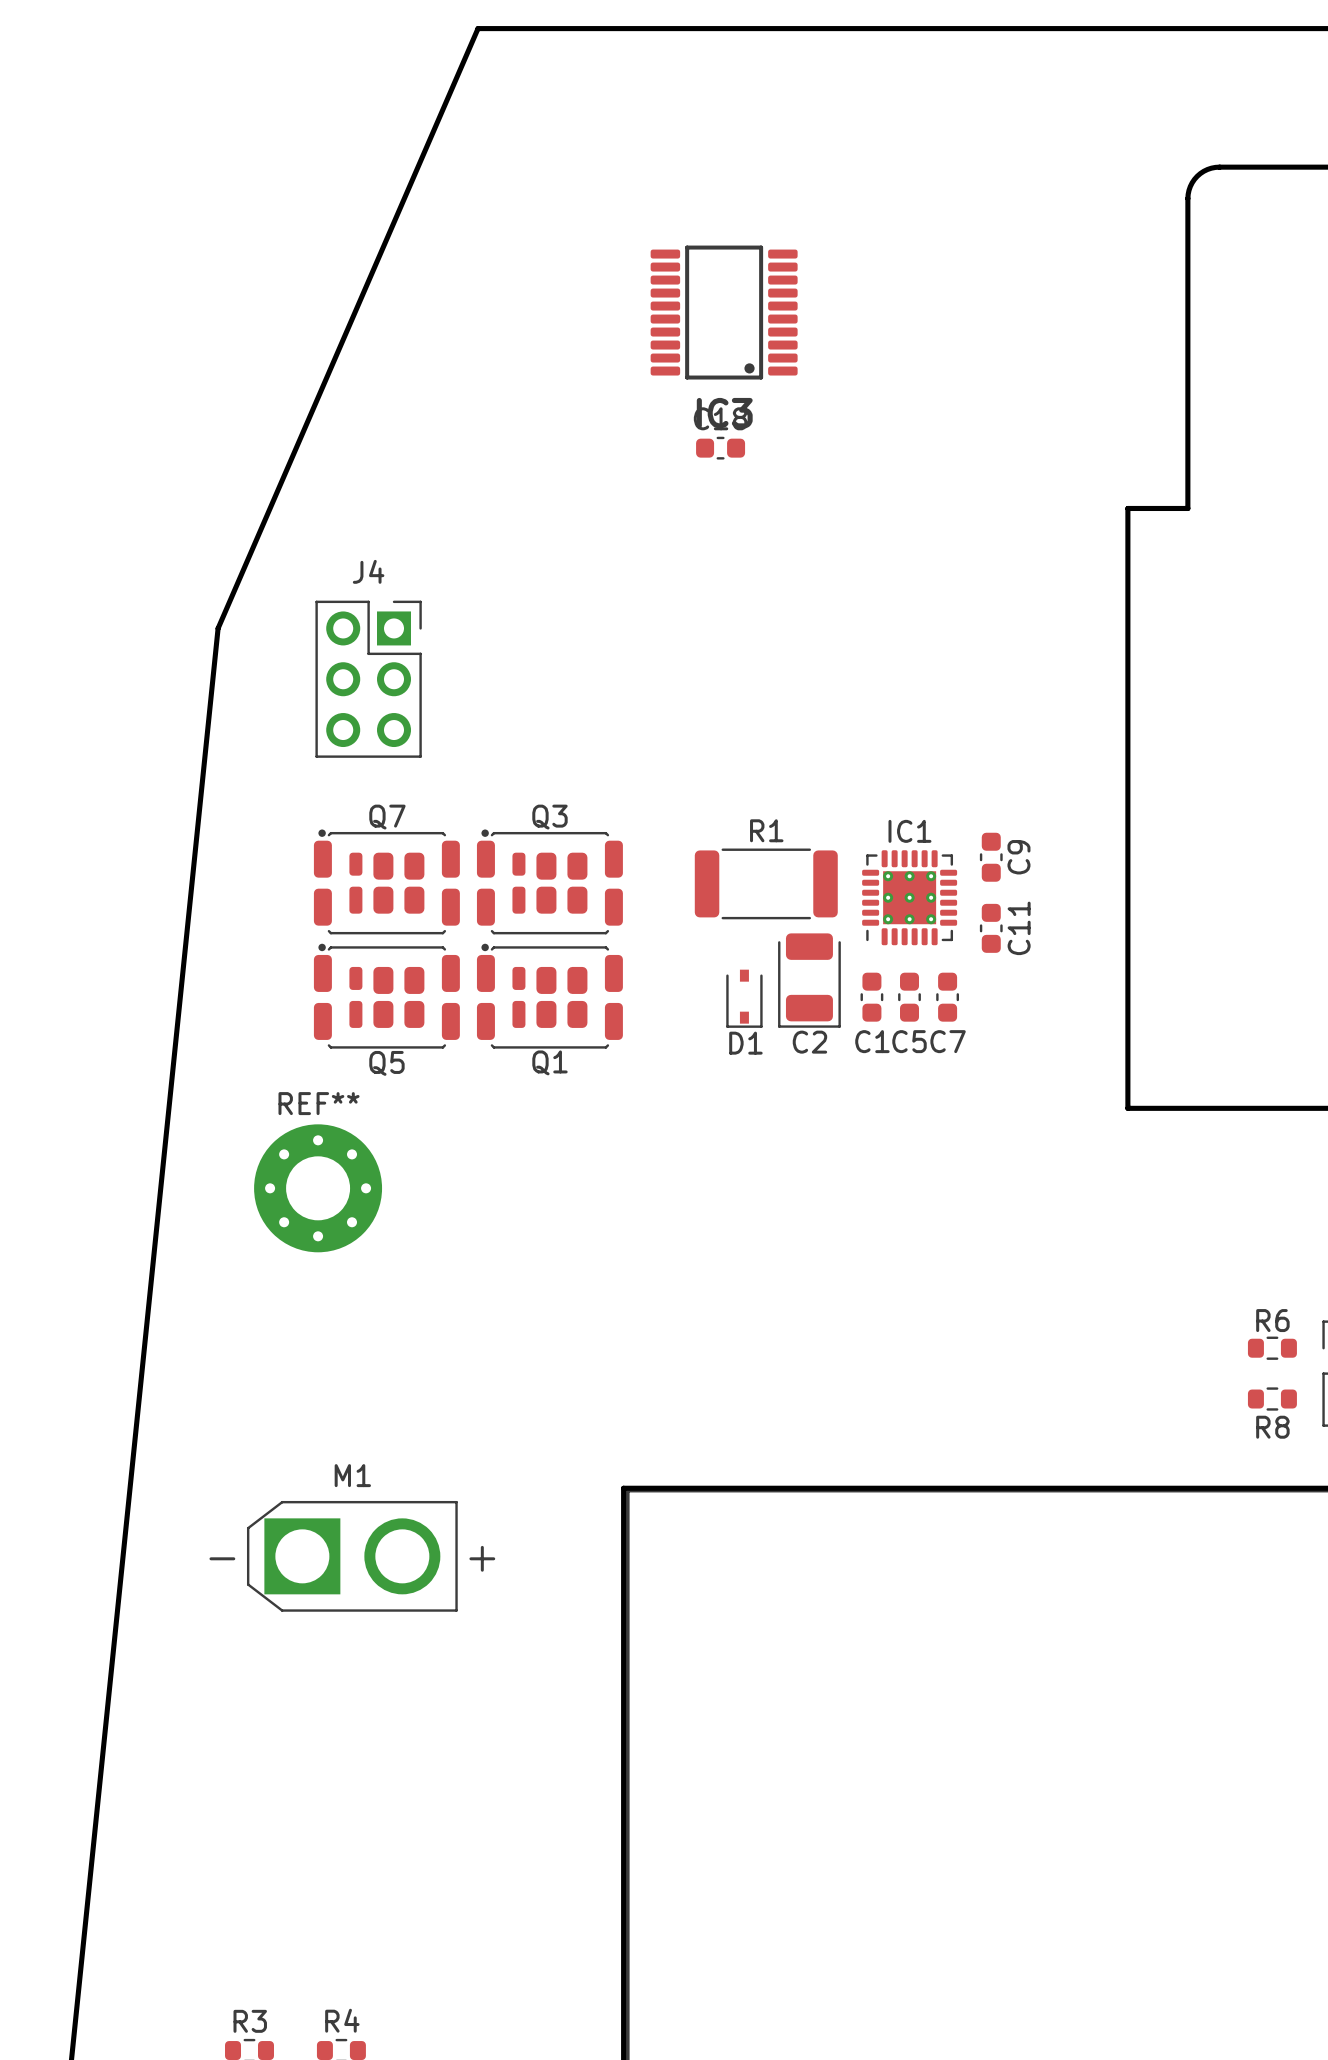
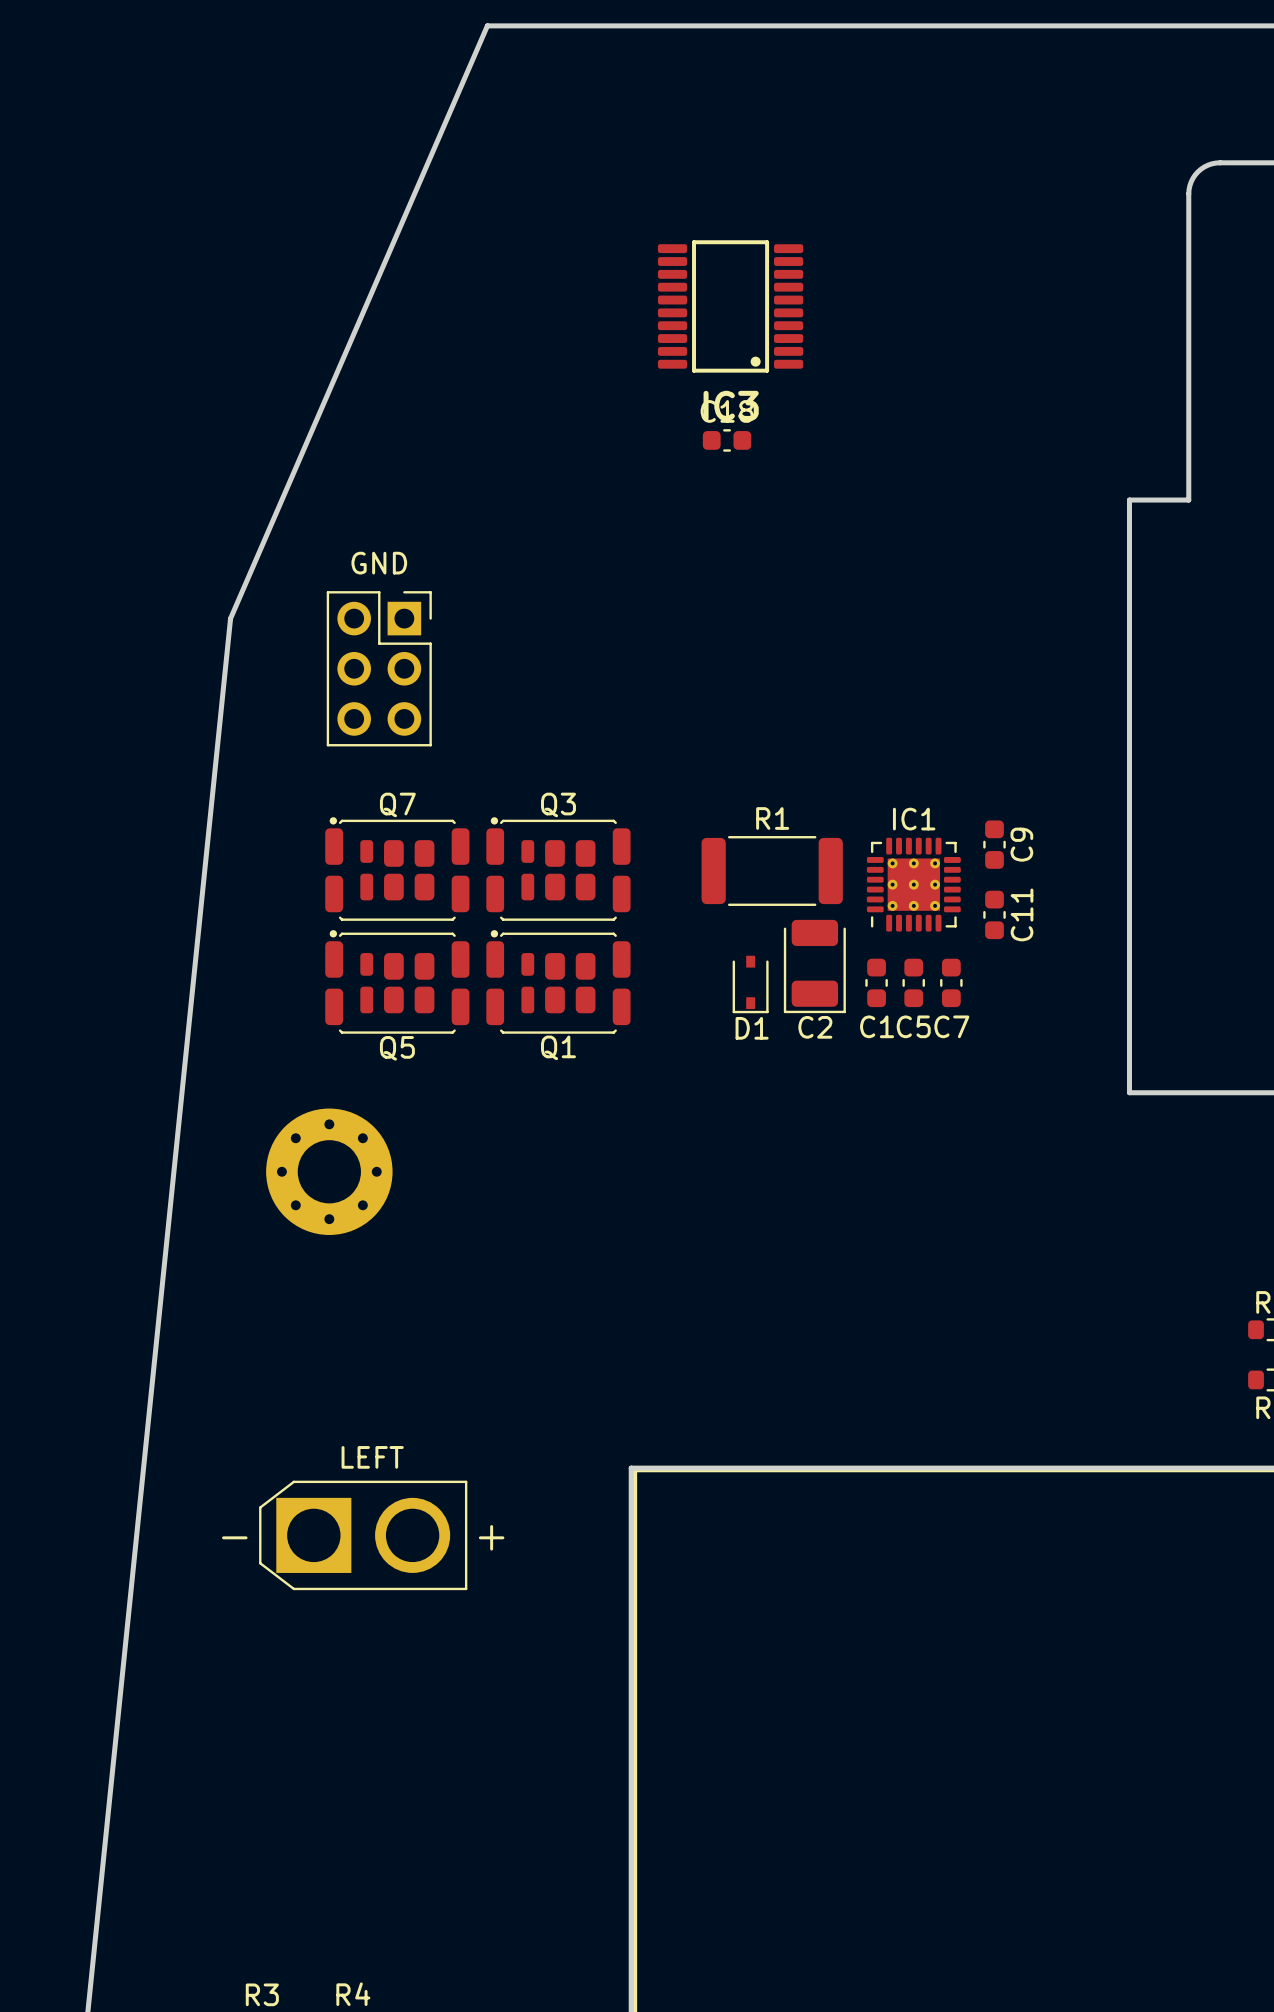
J4 name: J4 (368, 571) -> GND (379, 563)
REF** name: REF** (319, 1103) -> none
M1 name: M1 (352, 1475) -> LEFT (372, 1457)

